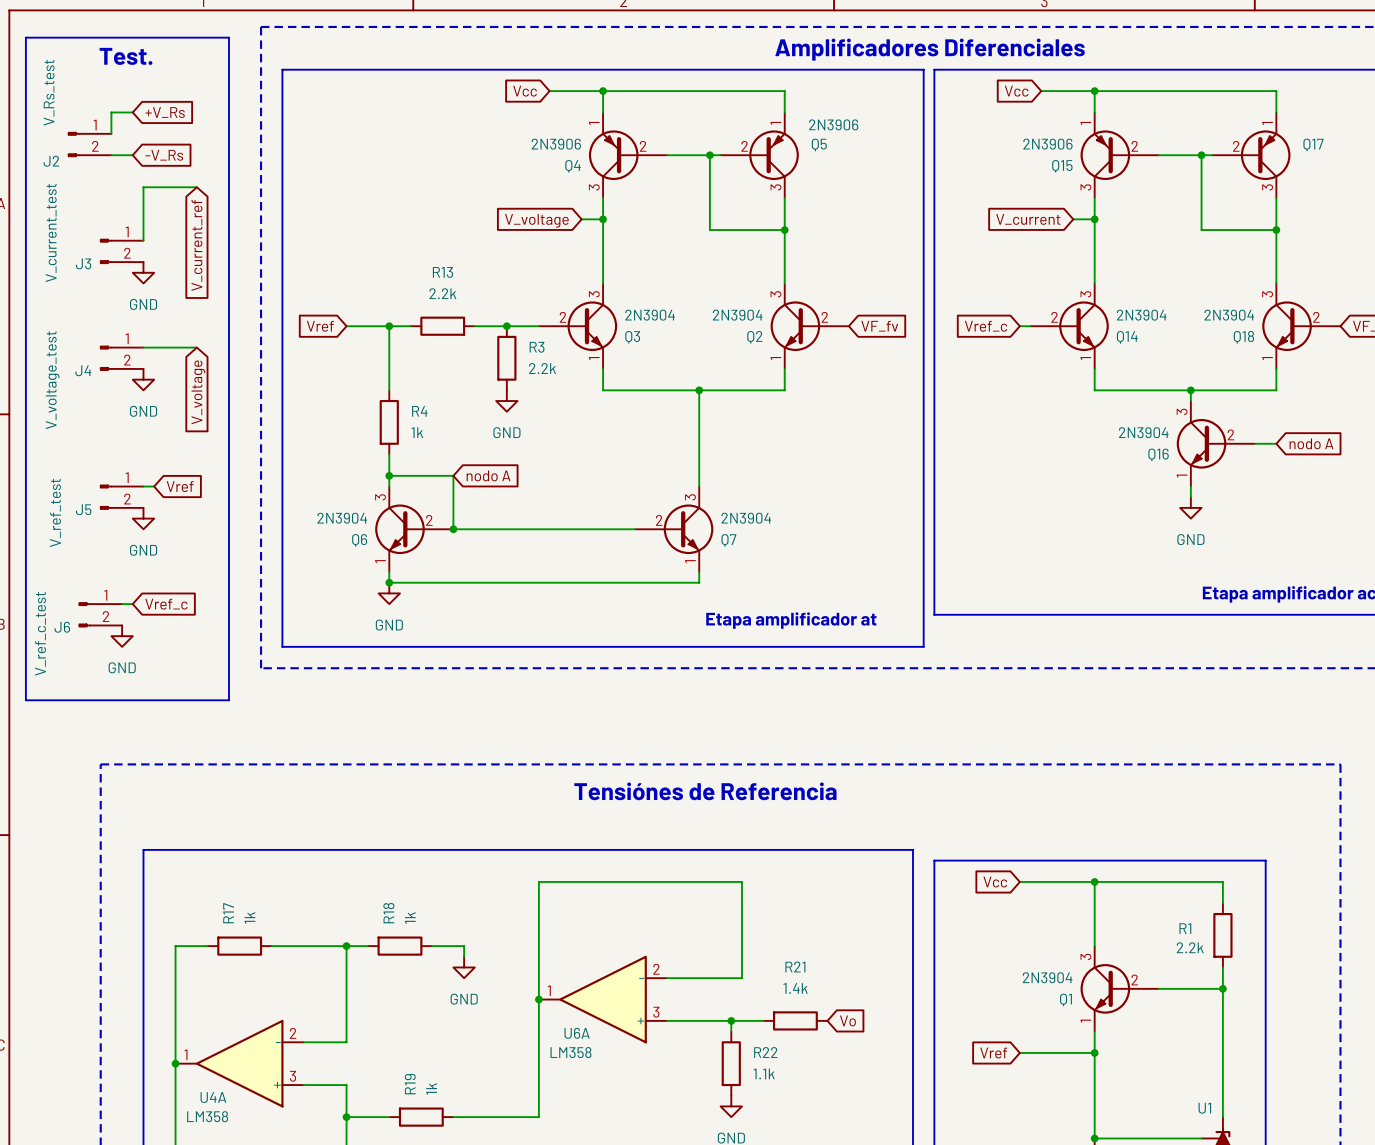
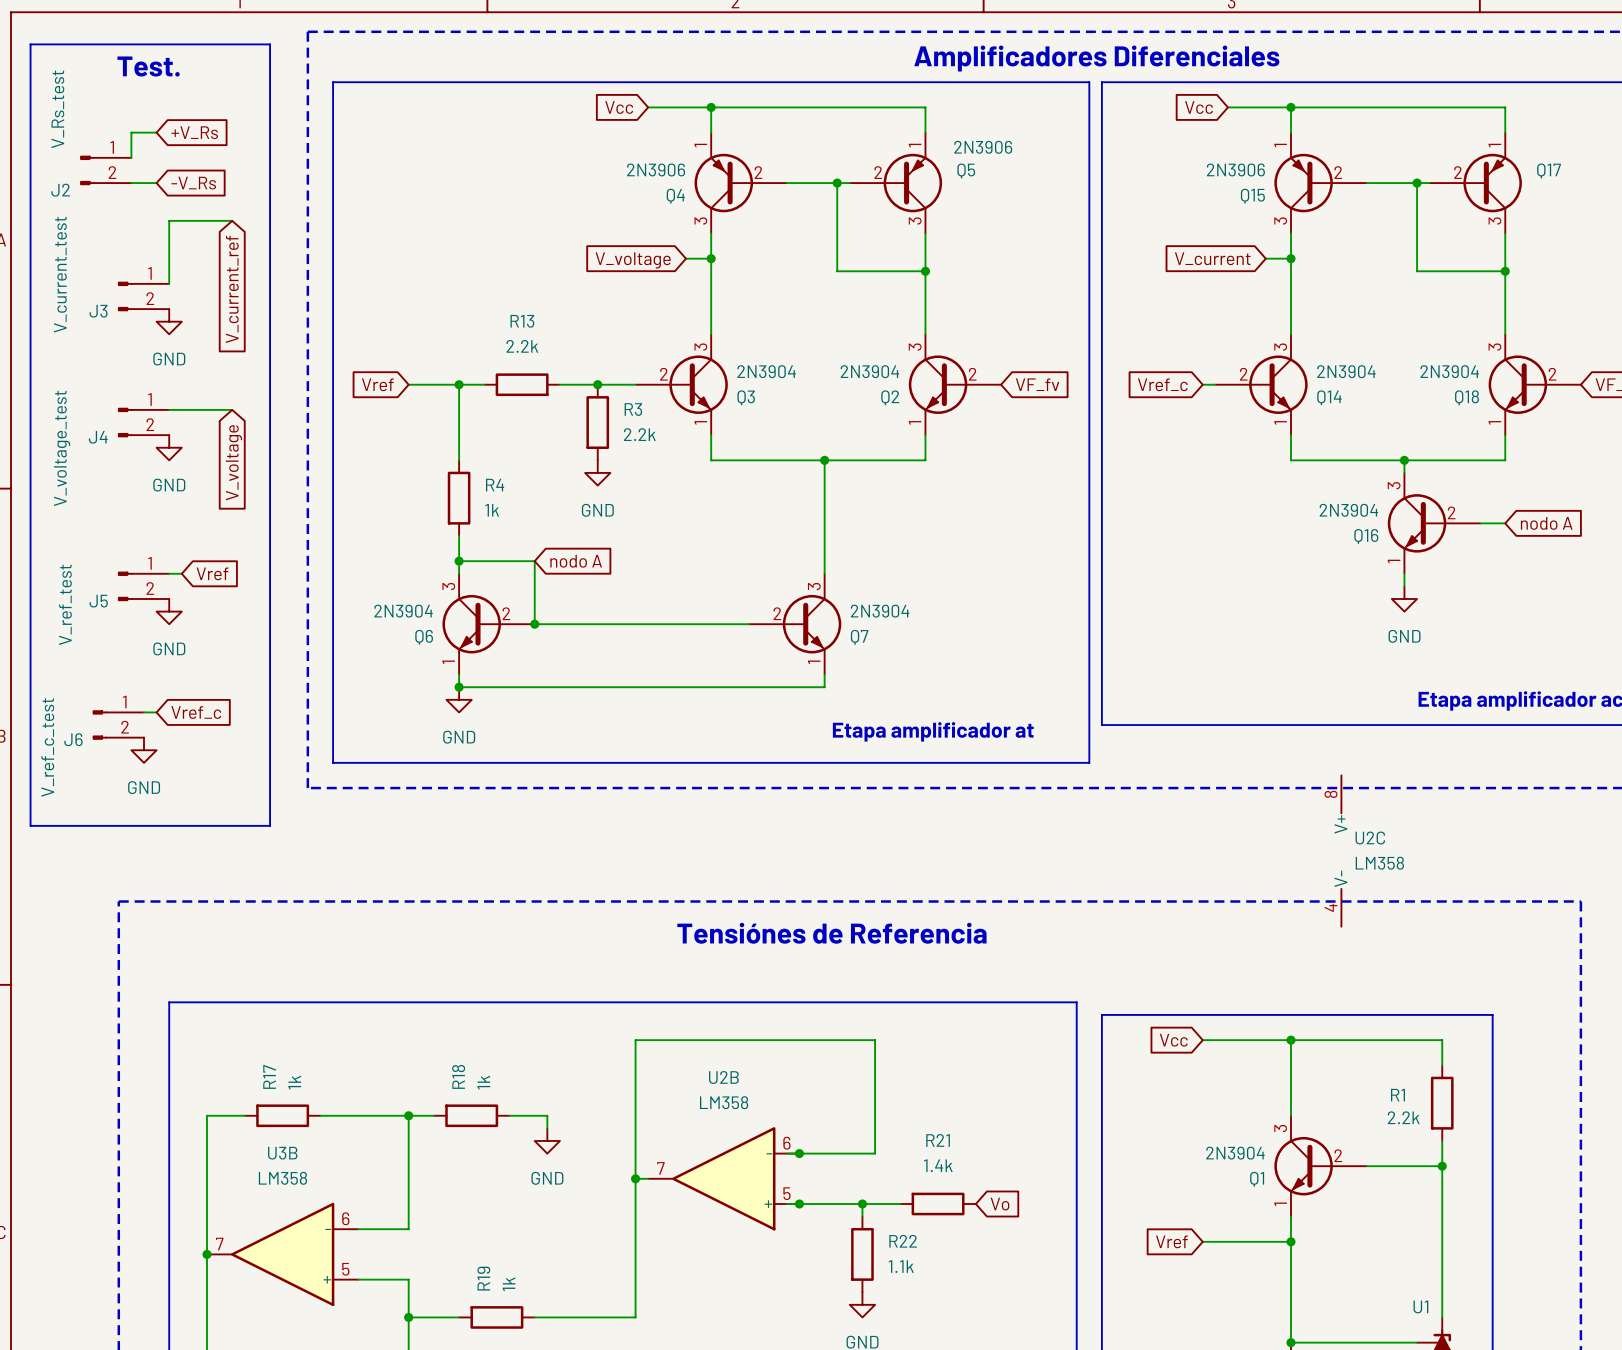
U2C: none -> LM358 (1341, 851)
junction: none -> (799, 1153)
U6A: LM358 (603, 999) -> none
U2B: none -> LM358 (723, 1178)
junction: none -> (799, 1204)
U4A pin number: 2 (293, 1033) -> 6 (345, 1218)
U4A pin number: 1 (185, 1054) -> 7 (219, 1244)
U4A pin number: 3 (292, 1076) -> 5 (345, 1269)
U4A name: U4A (213, 1097) -> U3B (282, 1153)
U4A value position: LM358 (207, 1116) -> LM358 (282, 1178)

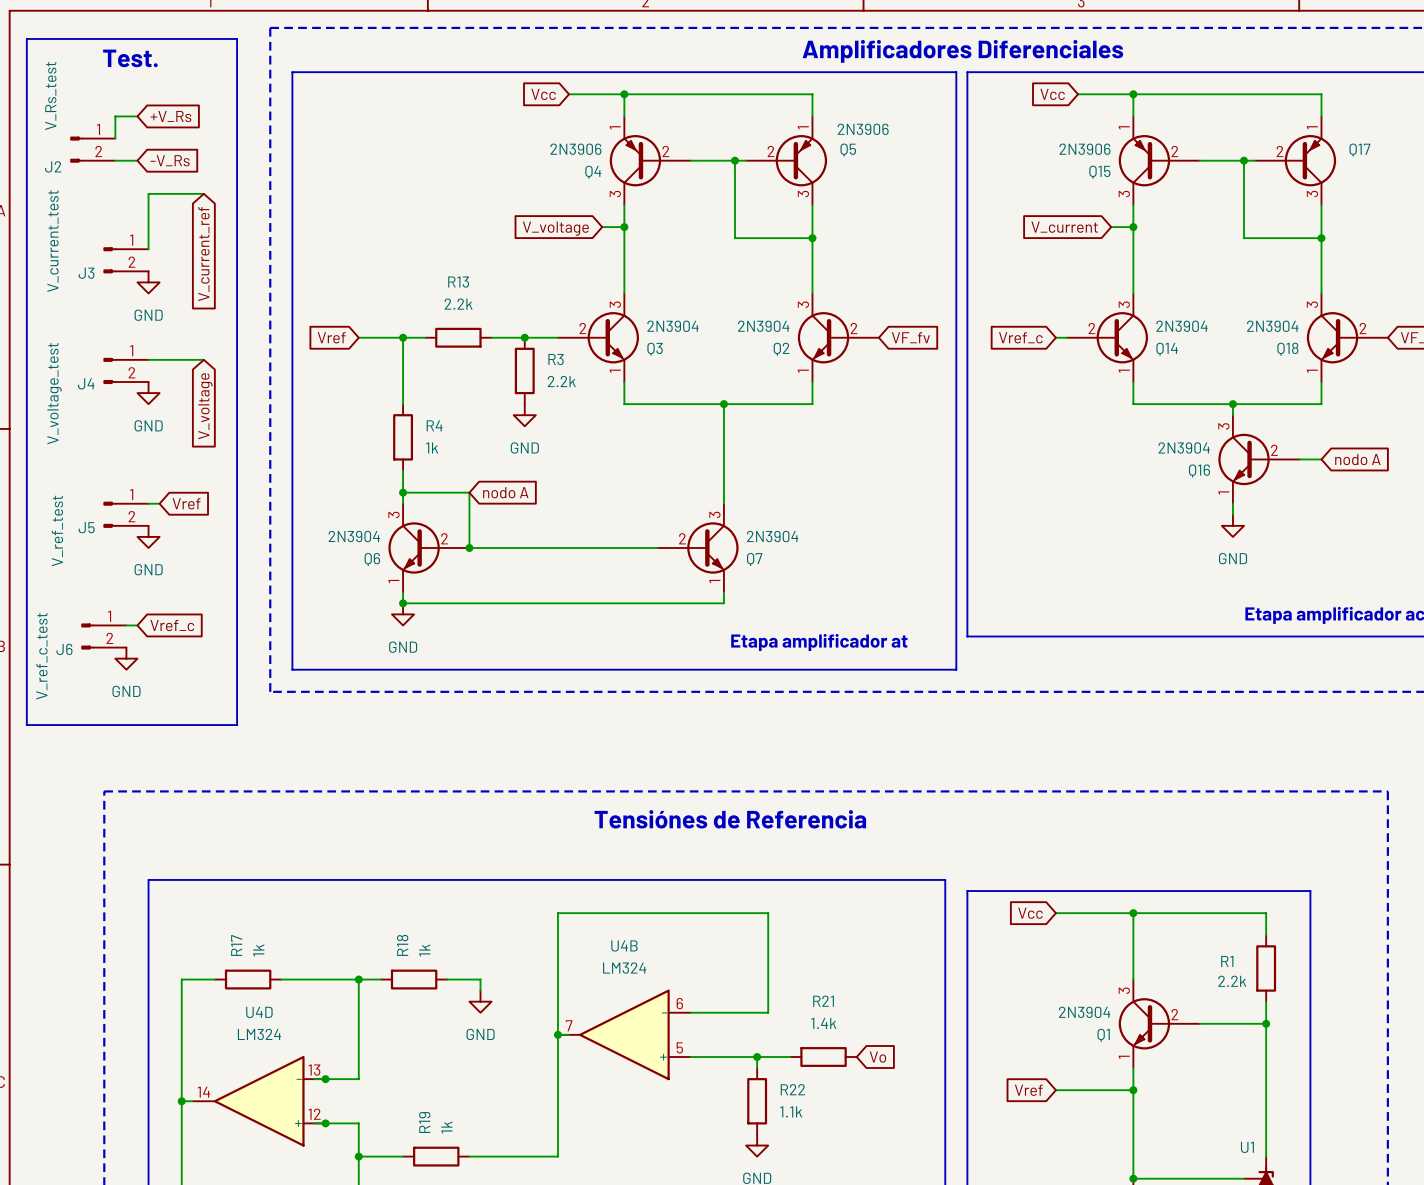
U2C: LM358 (1341, 851) -> none
junction: (799, 1153) -> none
U4B: none -> LM324 (624, 1034)
U2B: LM358 (723, 1178) -> none
junction: (799, 1204) -> none
junction: none -> (325, 1079)
U3B: LM358 (282, 1254) -> none
U4D: none -> LM324 (259, 1101)
junction: none -> (325, 1123)

